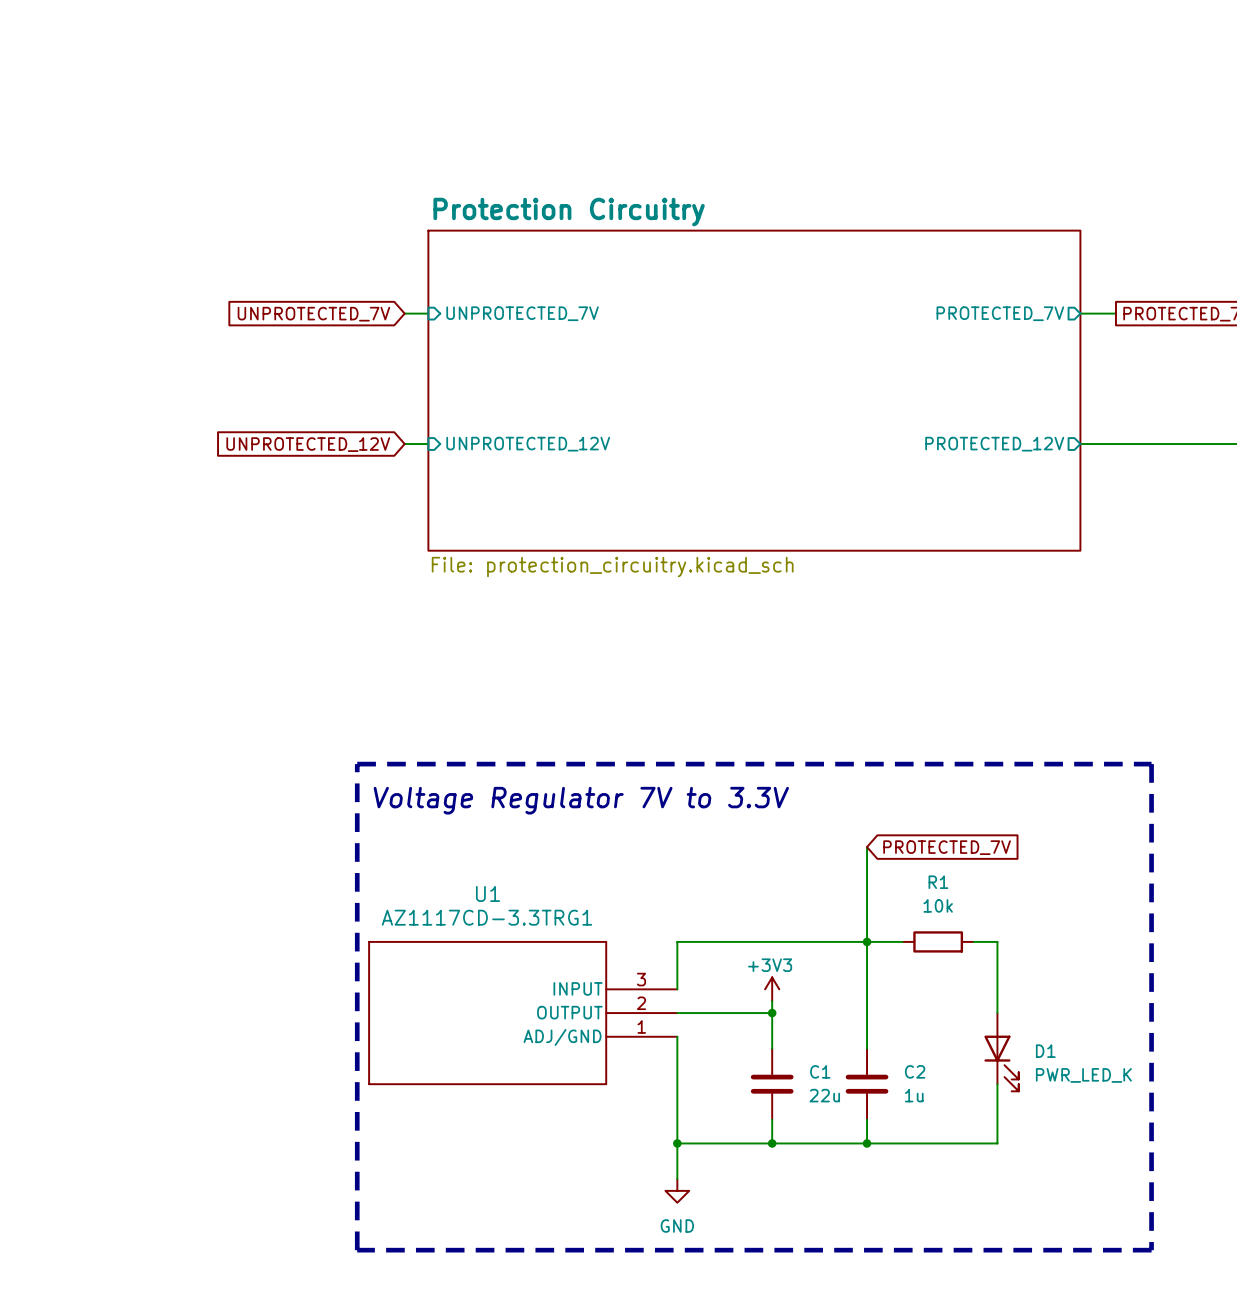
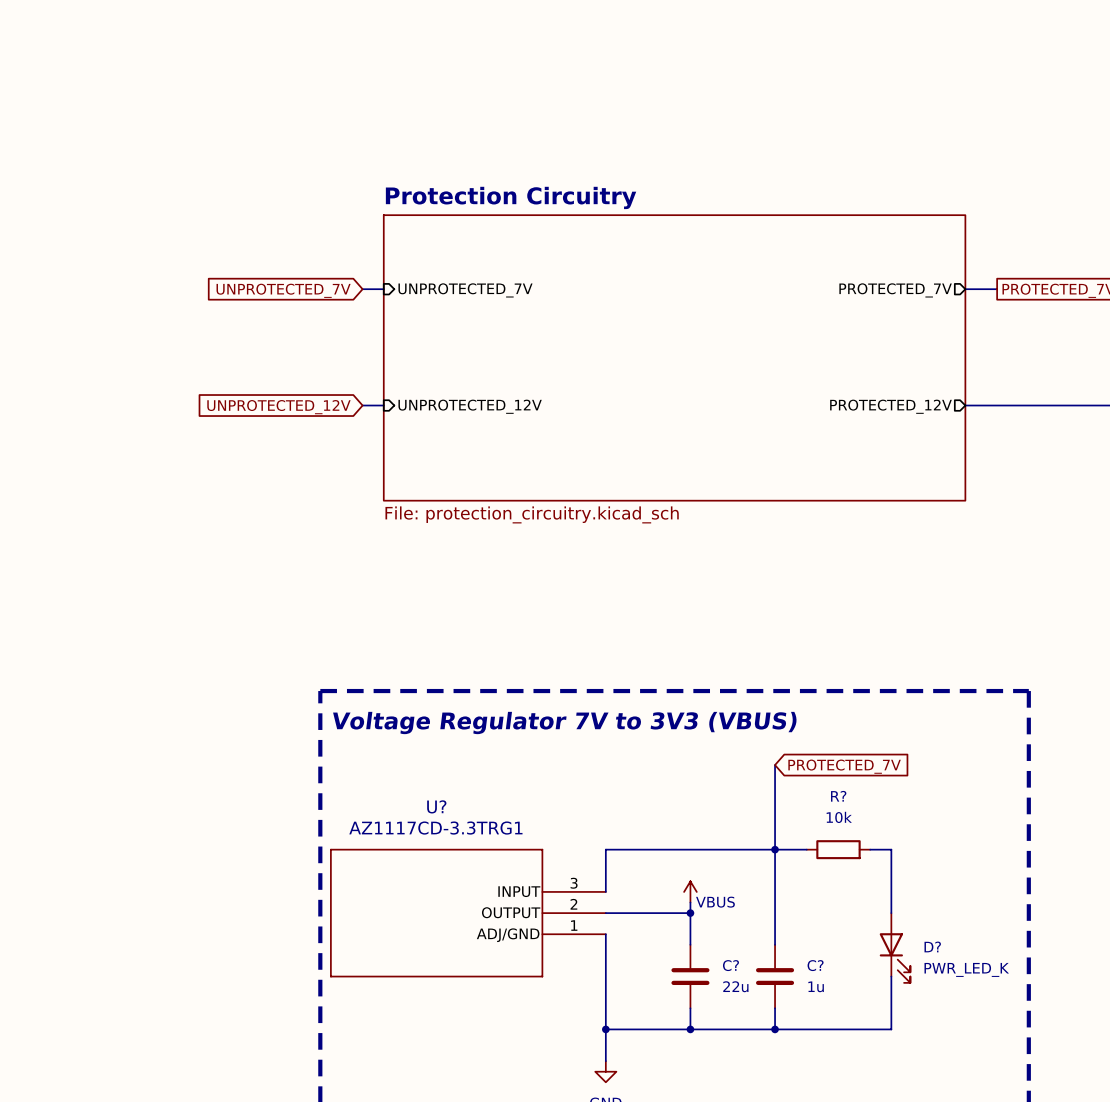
text: Voltage Regulator 7V to 3.3V (581, 800) -> Voltage Regulator 7V to 3V3 (VBUS) (564, 723)
R1 name: R1 (938, 882) -> R? (838, 796)
U1 name: U1 (488, 893) -> U? (436, 806)
power symbol: +3V3 (772, 989) -> VBUS (690, 891)
D1 name: D1 (1045, 1051) -> D? (932, 946)
C1 name: C1 (820, 1071) -> C? (730, 965)
C2 name: C2 (915, 1071) -> C? (815, 965)

